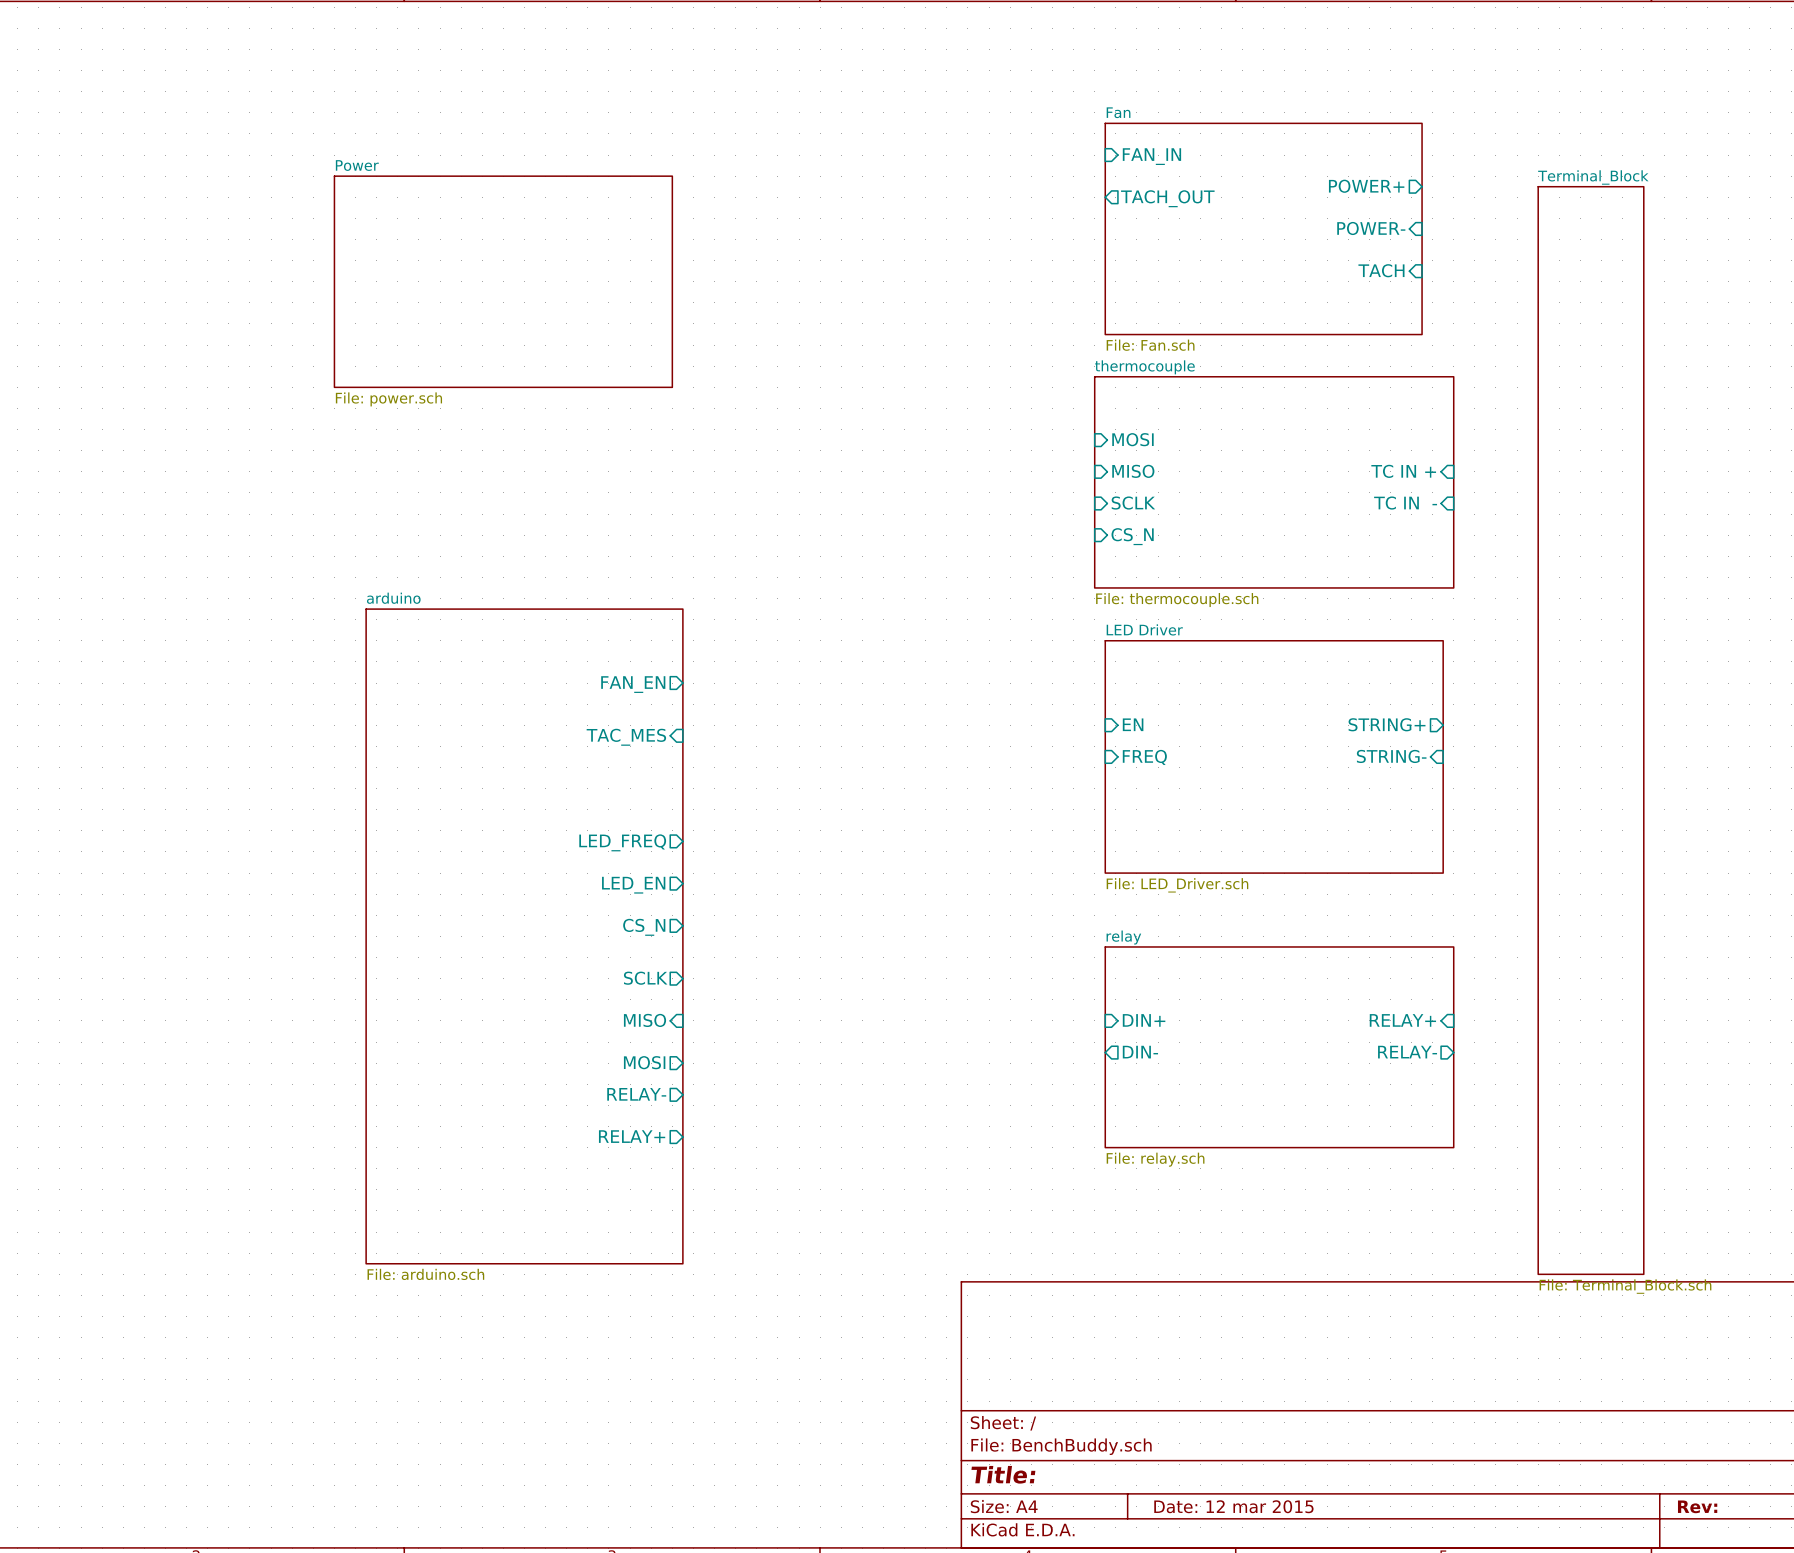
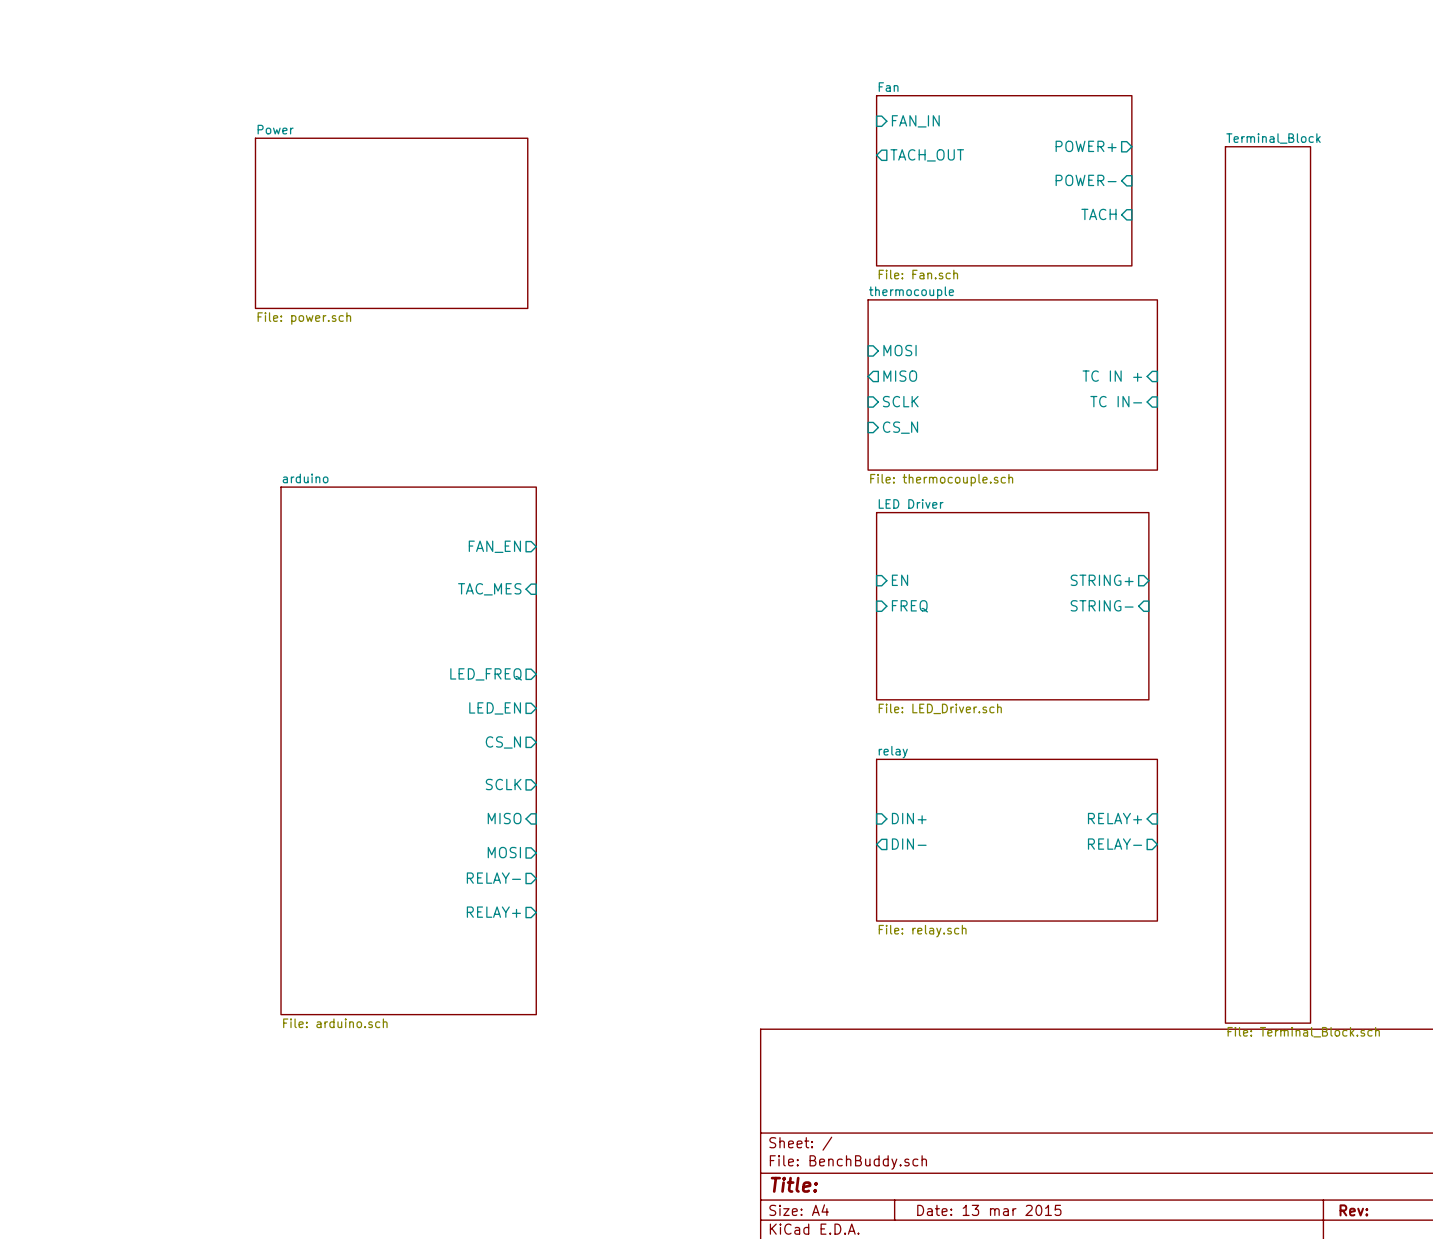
sheet pin shape: input (1133, 471) -> output (900, 376)
sheet pin: TC IN - (1405, 503) -> TC IN- (1116, 401)
title block: Date: 12 mar 2015 (1233, 1506) -> Date: 13 mar 2015 (989, 1210)

